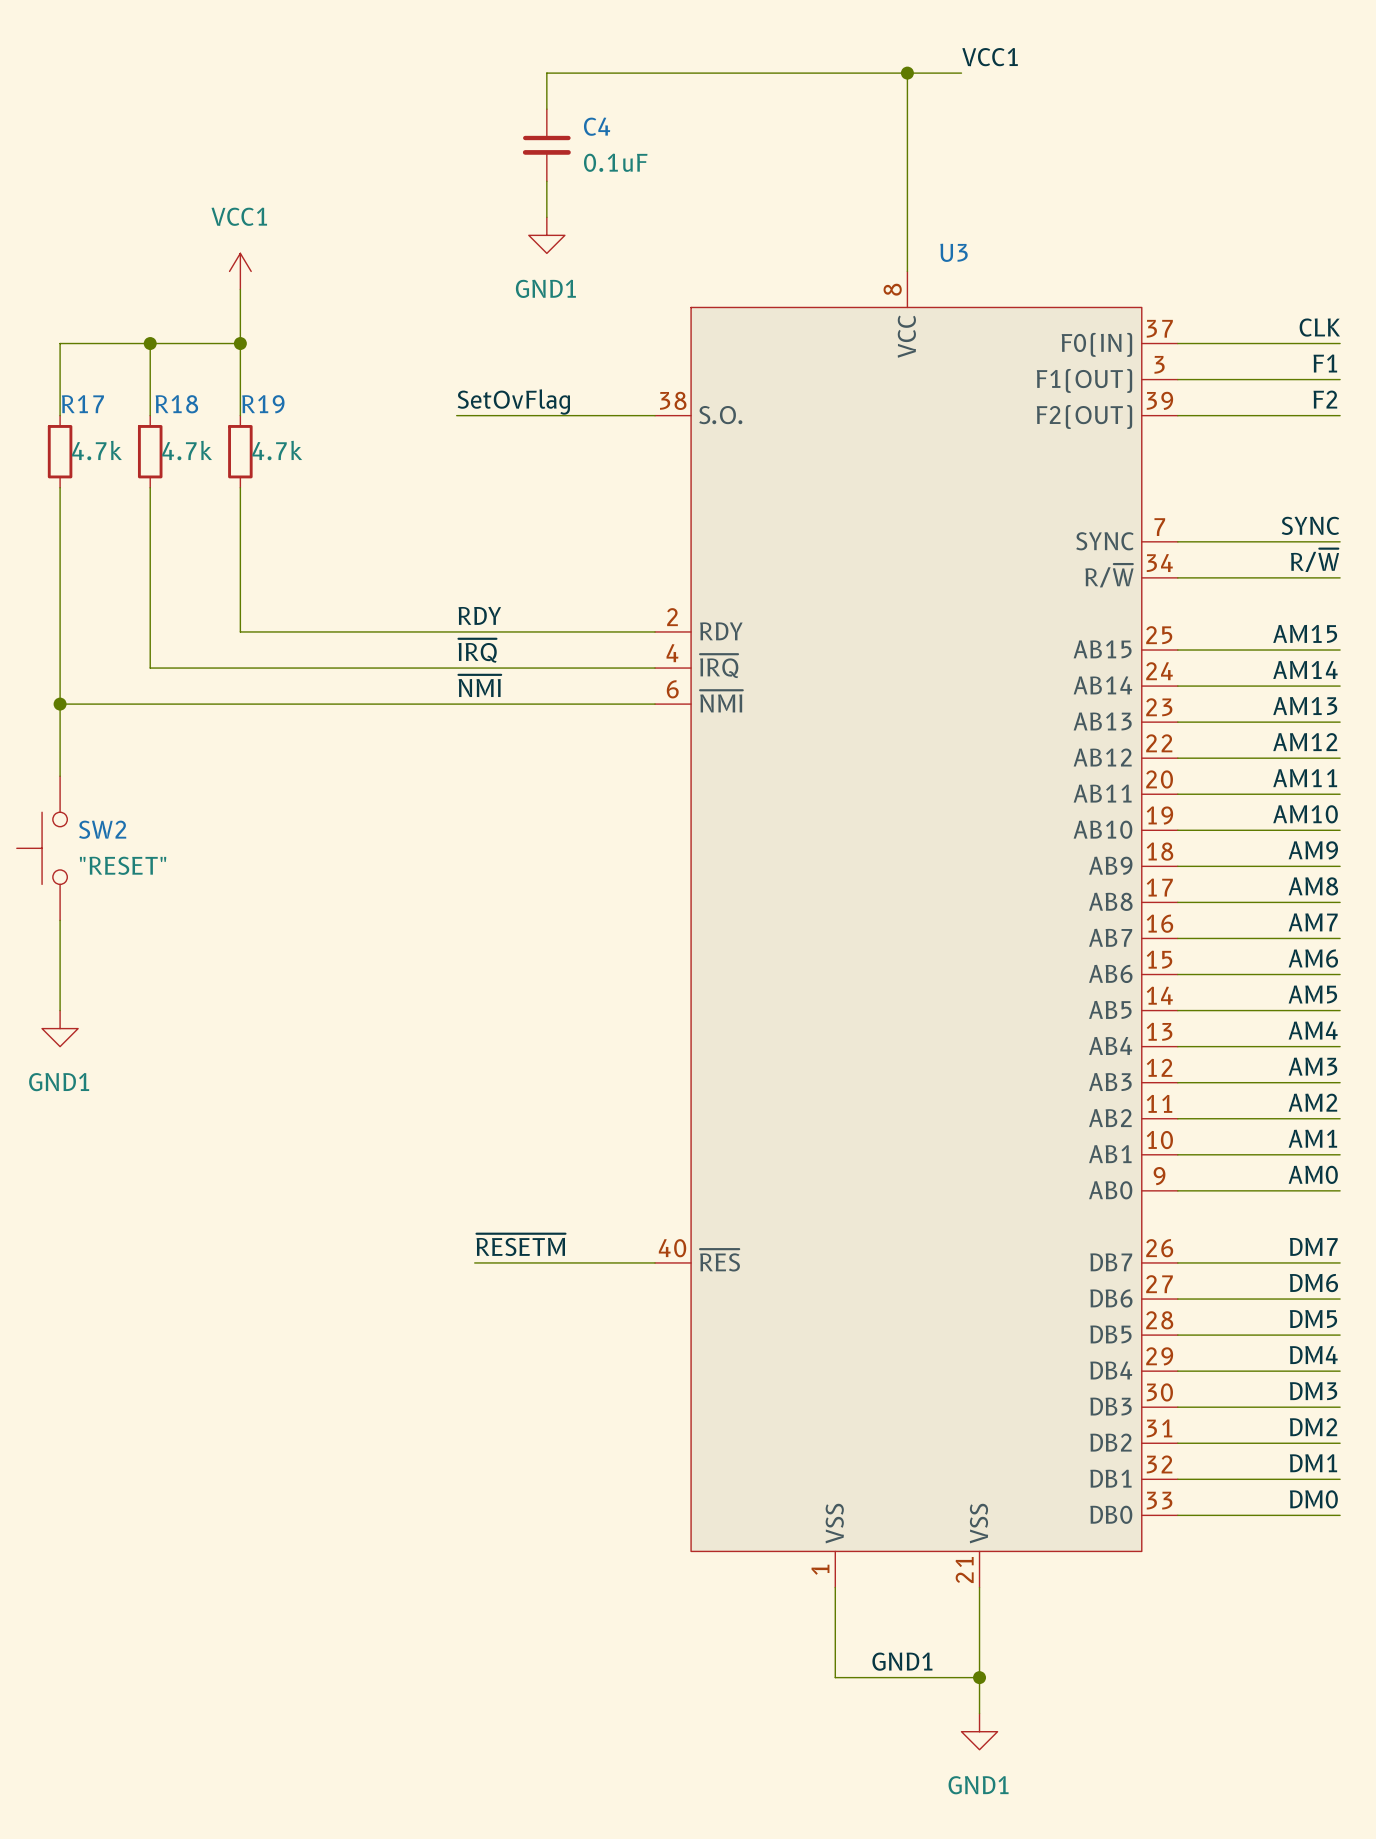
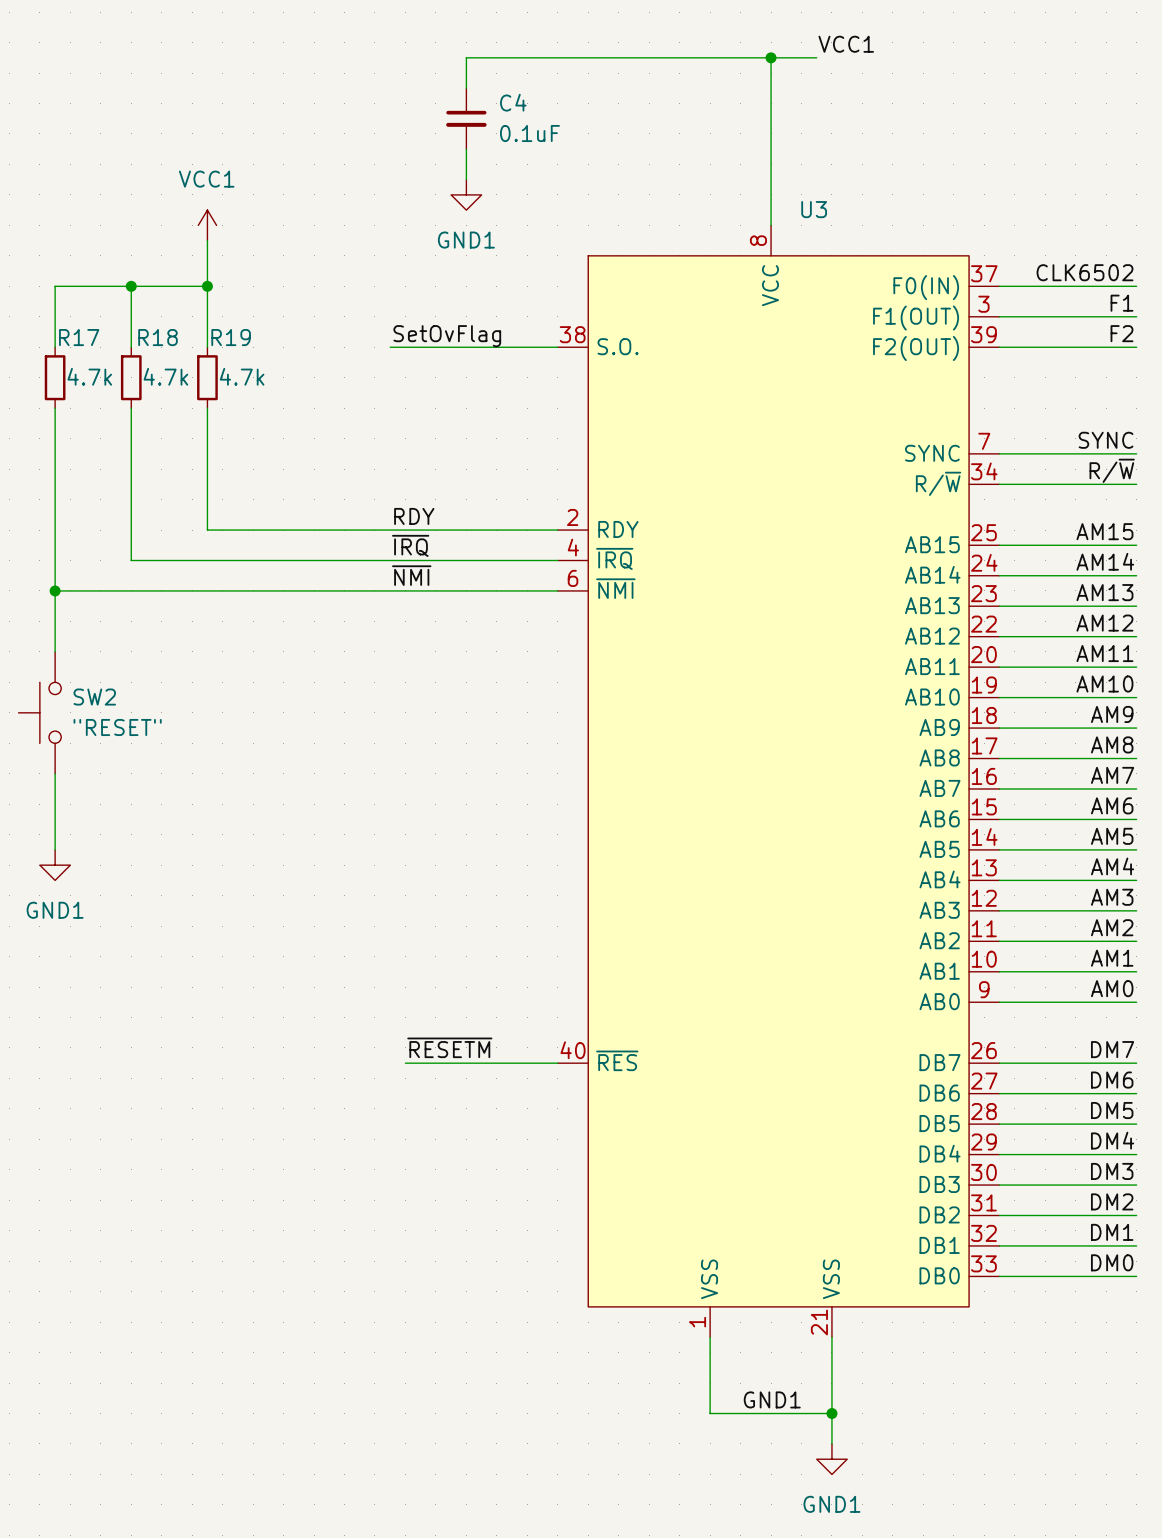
label: CLK (1319, 327) -> CLK6502 (1085, 272)

